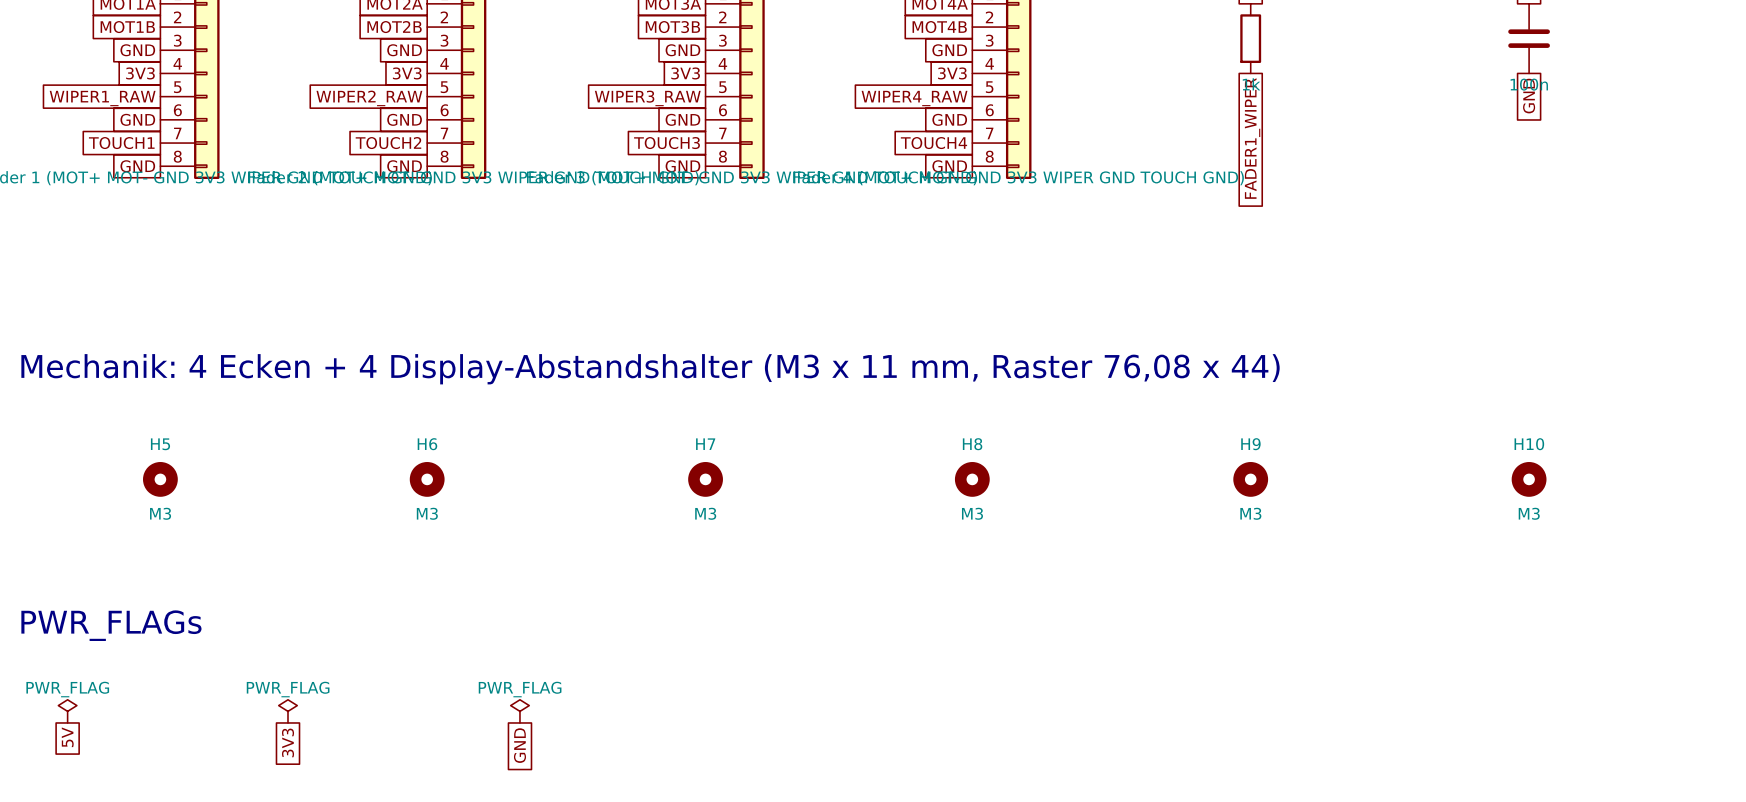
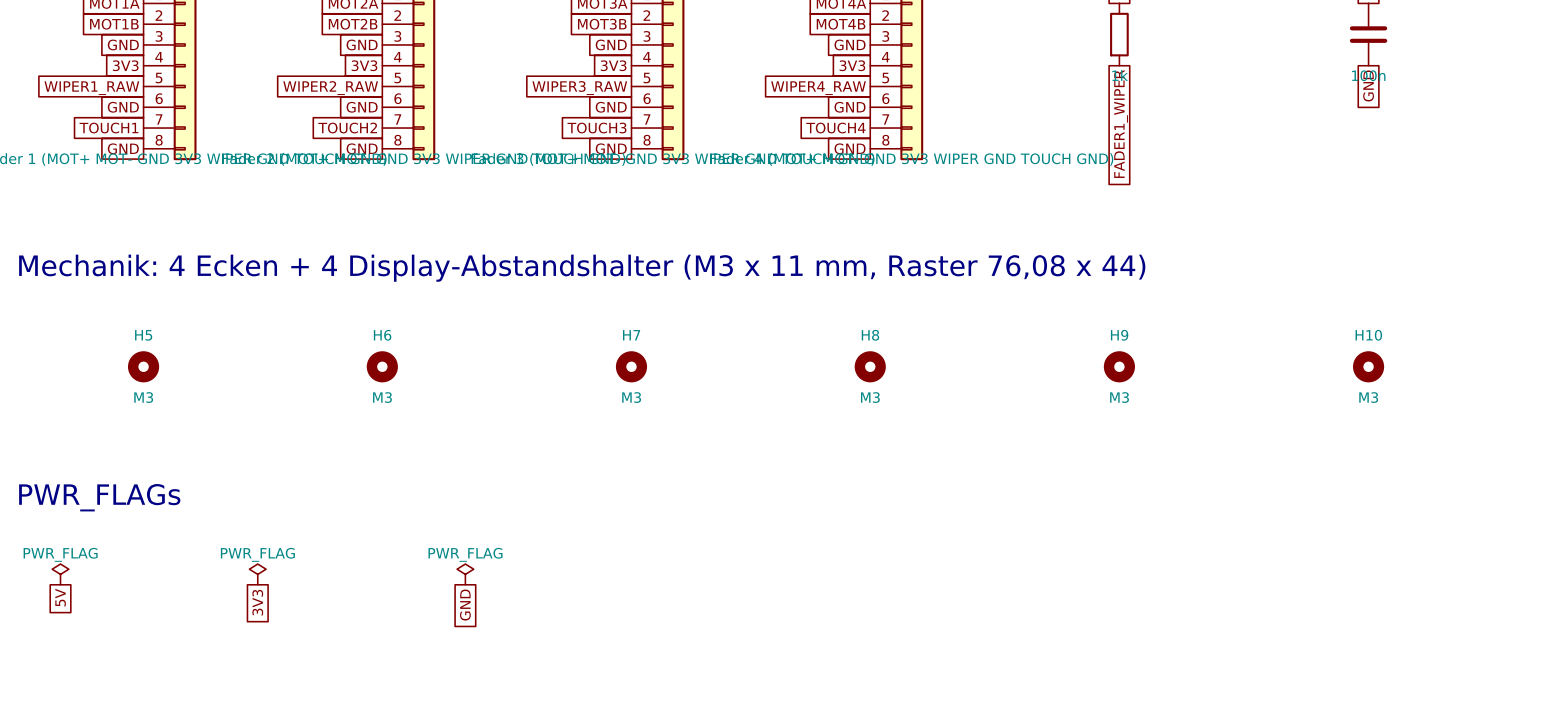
text position: Mechanik: 4 Ecken + 4 Display-Abstandshalter (M3 x 11 mm, Raster 76,08 x 44) (650, 369) -> Mechanik: 4 Ecken + 4 Display-Abstandshalter (M3 x 11 mm, Raster 76,08 x 44) (582, 268)
H5 position: (160, 479) -> (143, 366)
H6 position: (427, 479) -> (382, 366)
H7 position: (705, 479) -> (631, 366)
H8 position: (972, 479) -> (870, 366)
H9 position: (1250, 479) -> (1119, 366)
H10 position: (1529, 479) -> (1368, 366)
text position: PWR_FLAGs (111, 625) -> PWR_FLAGs (99, 497)
power symbol position: PWR_FLAG (67, 711) -> PWR_FLAG (60, 574)
power symbol position: PWR_FLAG (287, 711) -> PWR_FLAG (257, 574)
power symbol position: PWR_FLAG (519, 711) -> PWR_FLAG (465, 574)
global label position: 5V (67, 737) -> 5V (60, 597)
global label position: 3V3 (288, 742) -> 3V3 (257, 602)
global label position: GND (519, 745) -> GND (465, 605)

